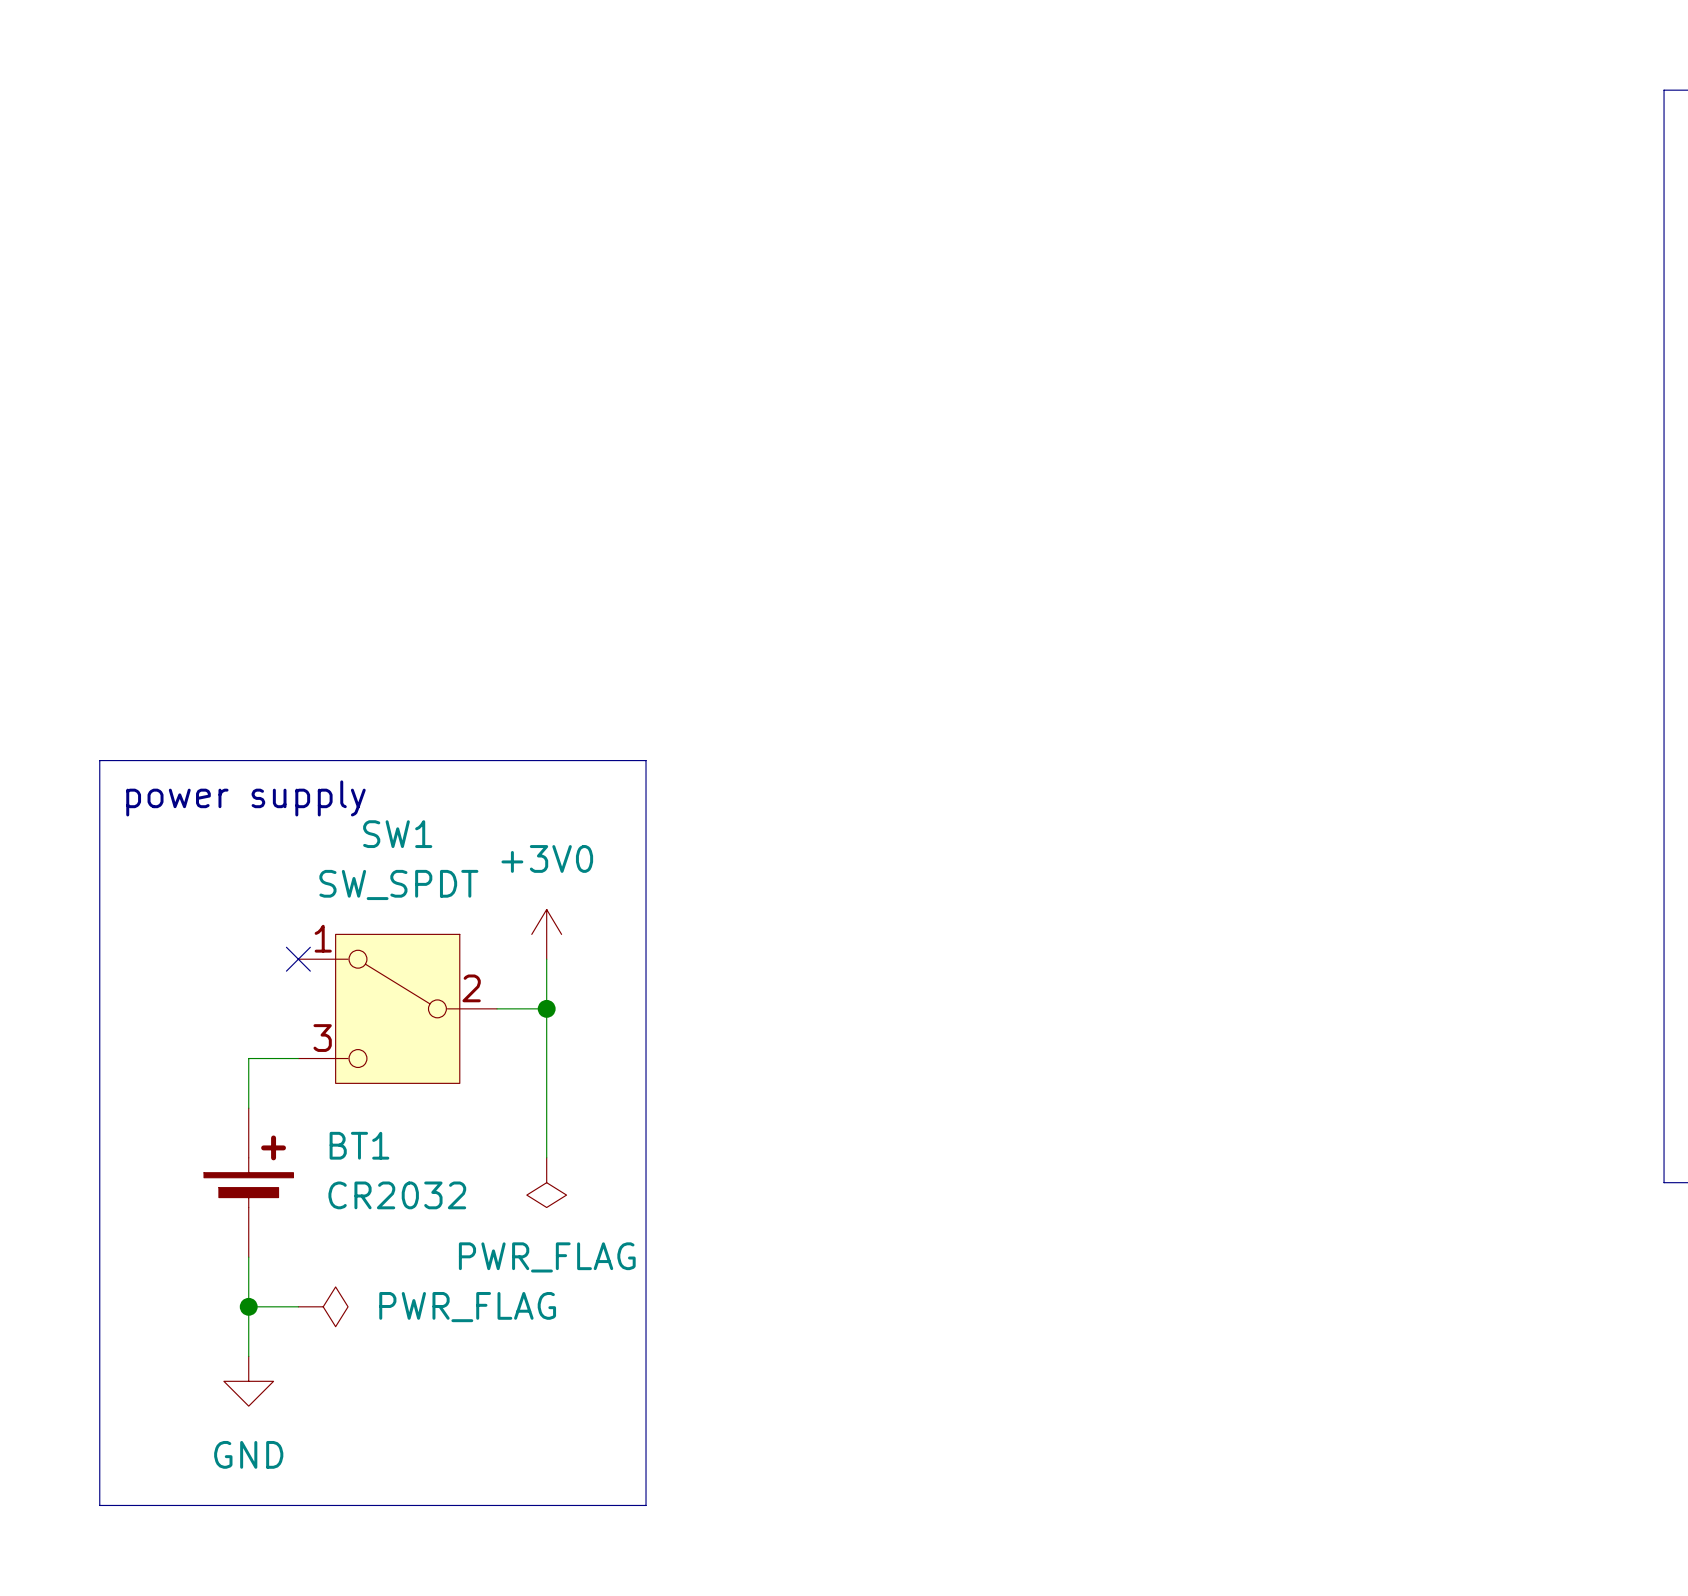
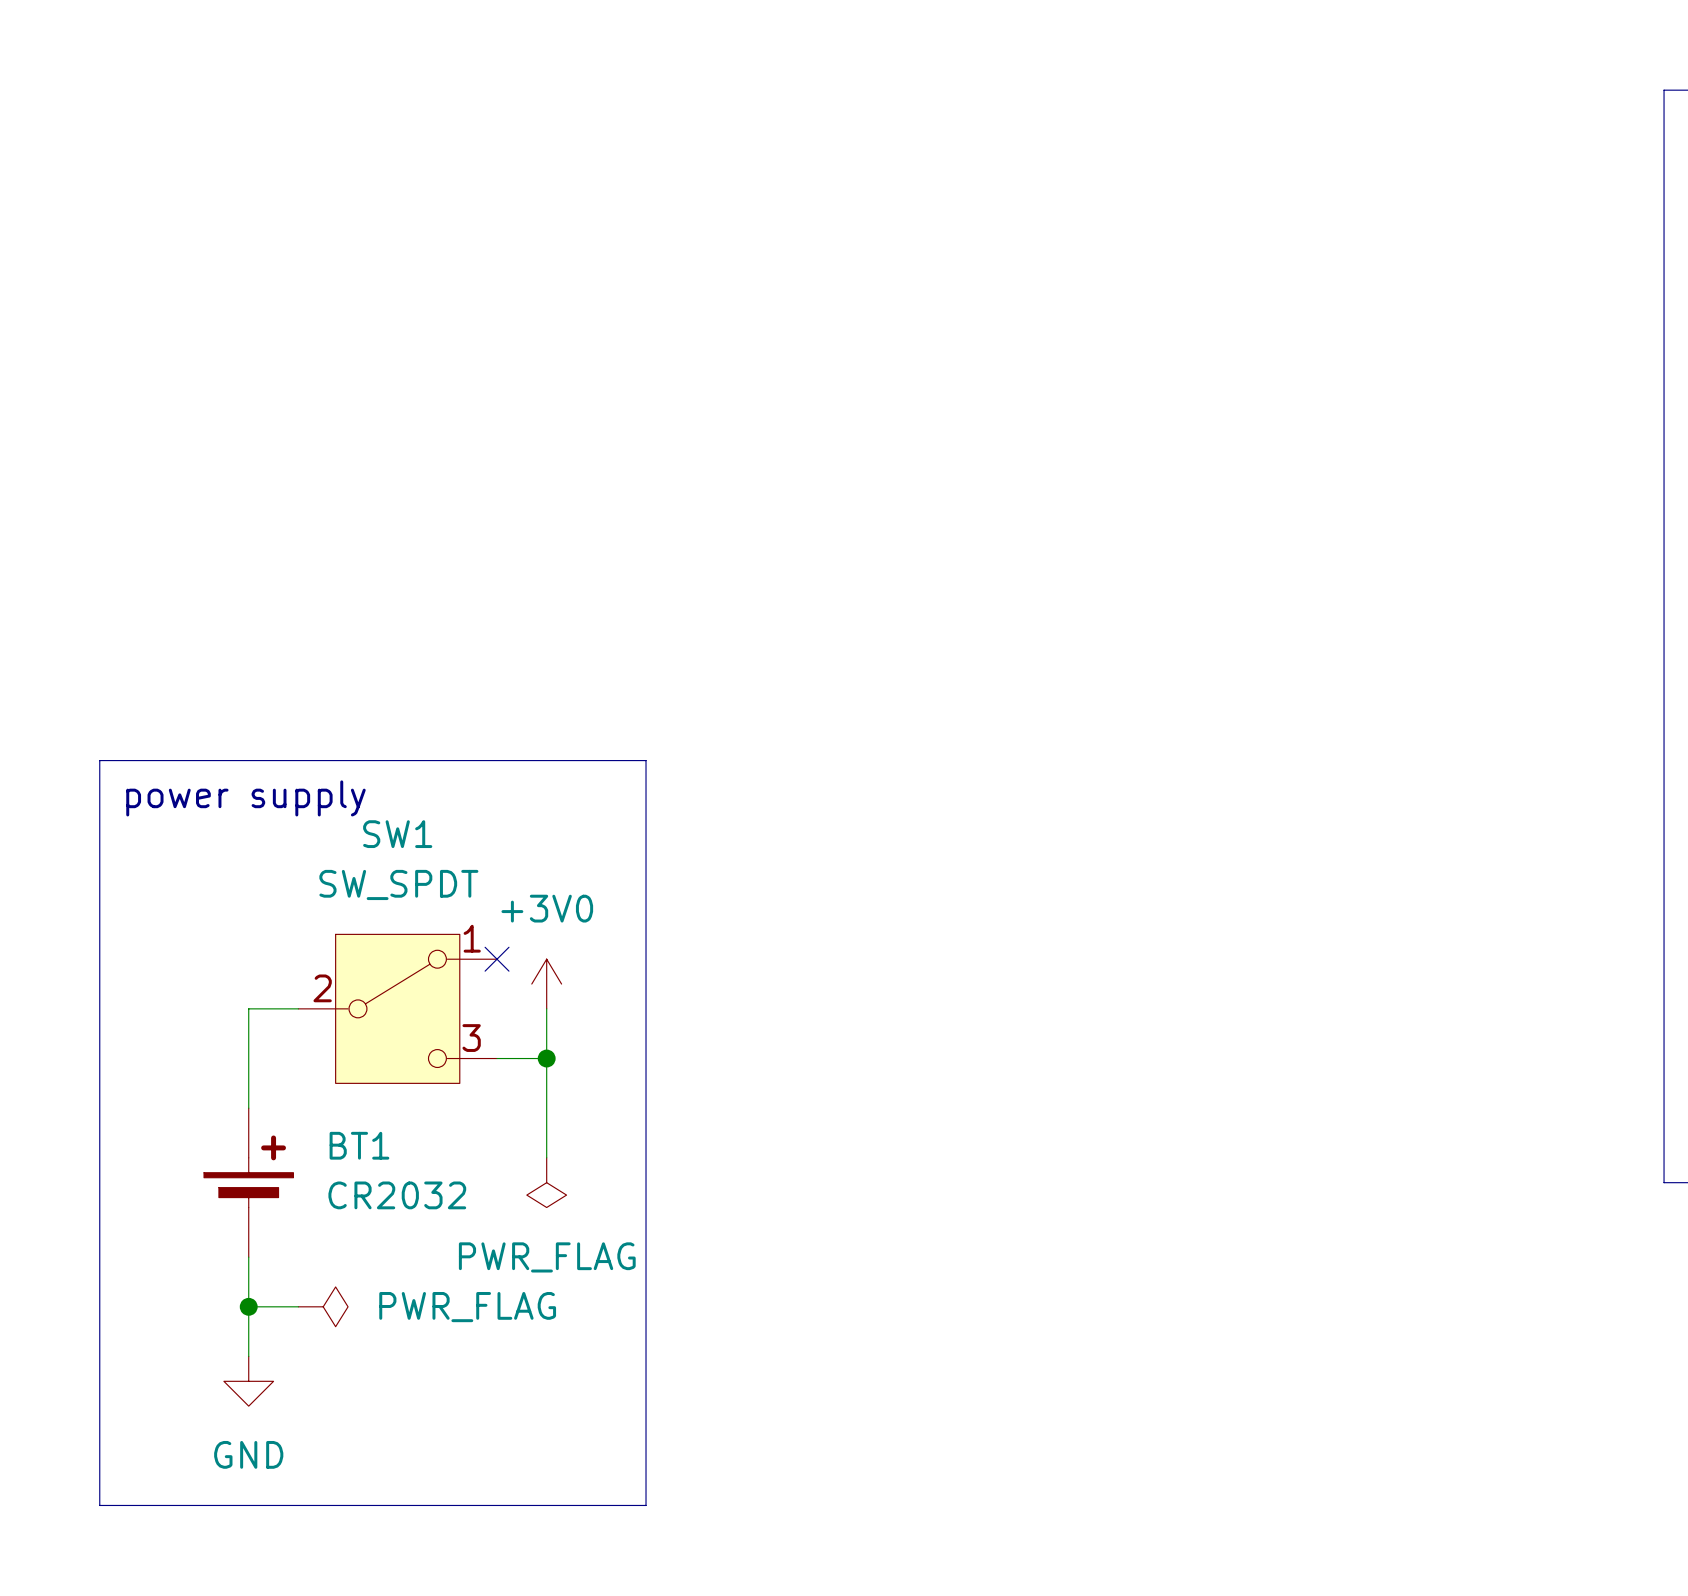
power symbol position: +3V0 (546, 934) -> +3V0 (546, 984)
no-connect mark: (298, 959) -> none
no-connect mark: none -> (497, 959)
wire: (546, 959) (546, 1008) (497, 1008) -> none
SW1 flip: as is (397, 1008) -> left-right (397, 1008)
junction position: (546, 1008) -> (546, 1058)
wire: (248, 1058) (298, 1058) -> (248, 1058) (248, 1008) (298, 1008)
wire: none -> (497, 1058) (546, 1058)

